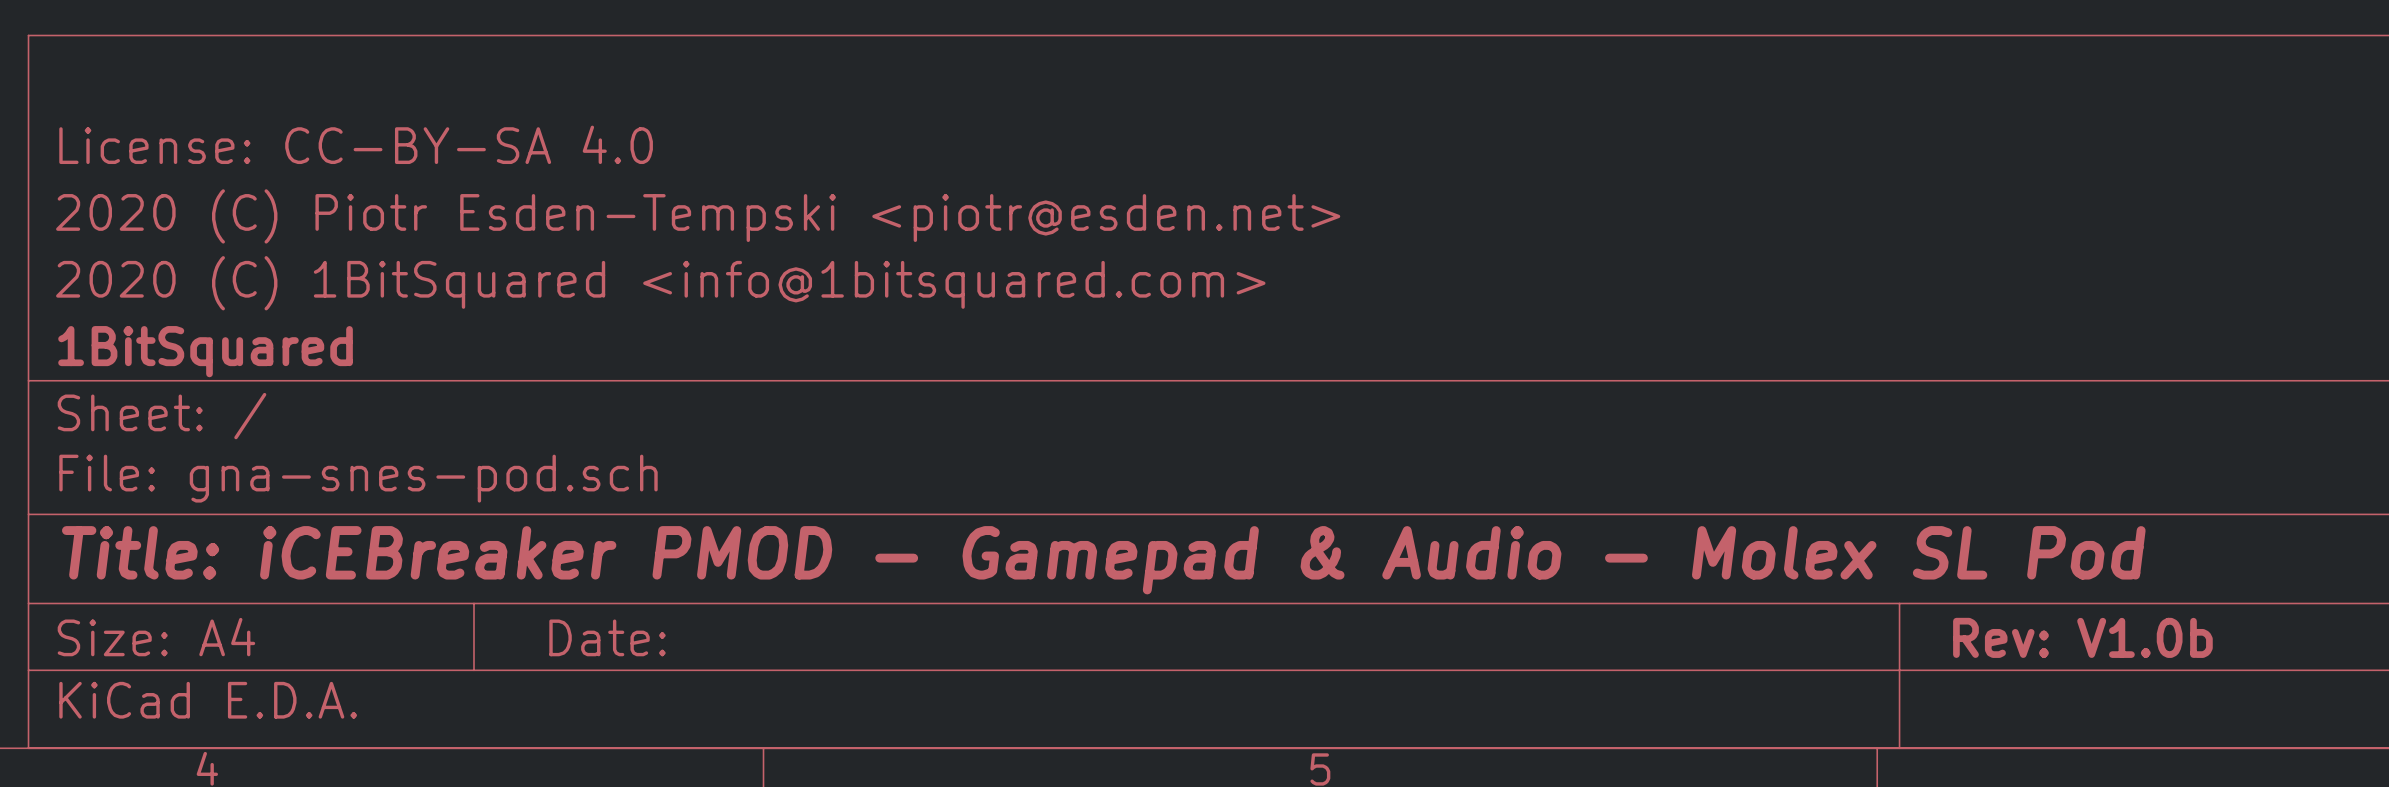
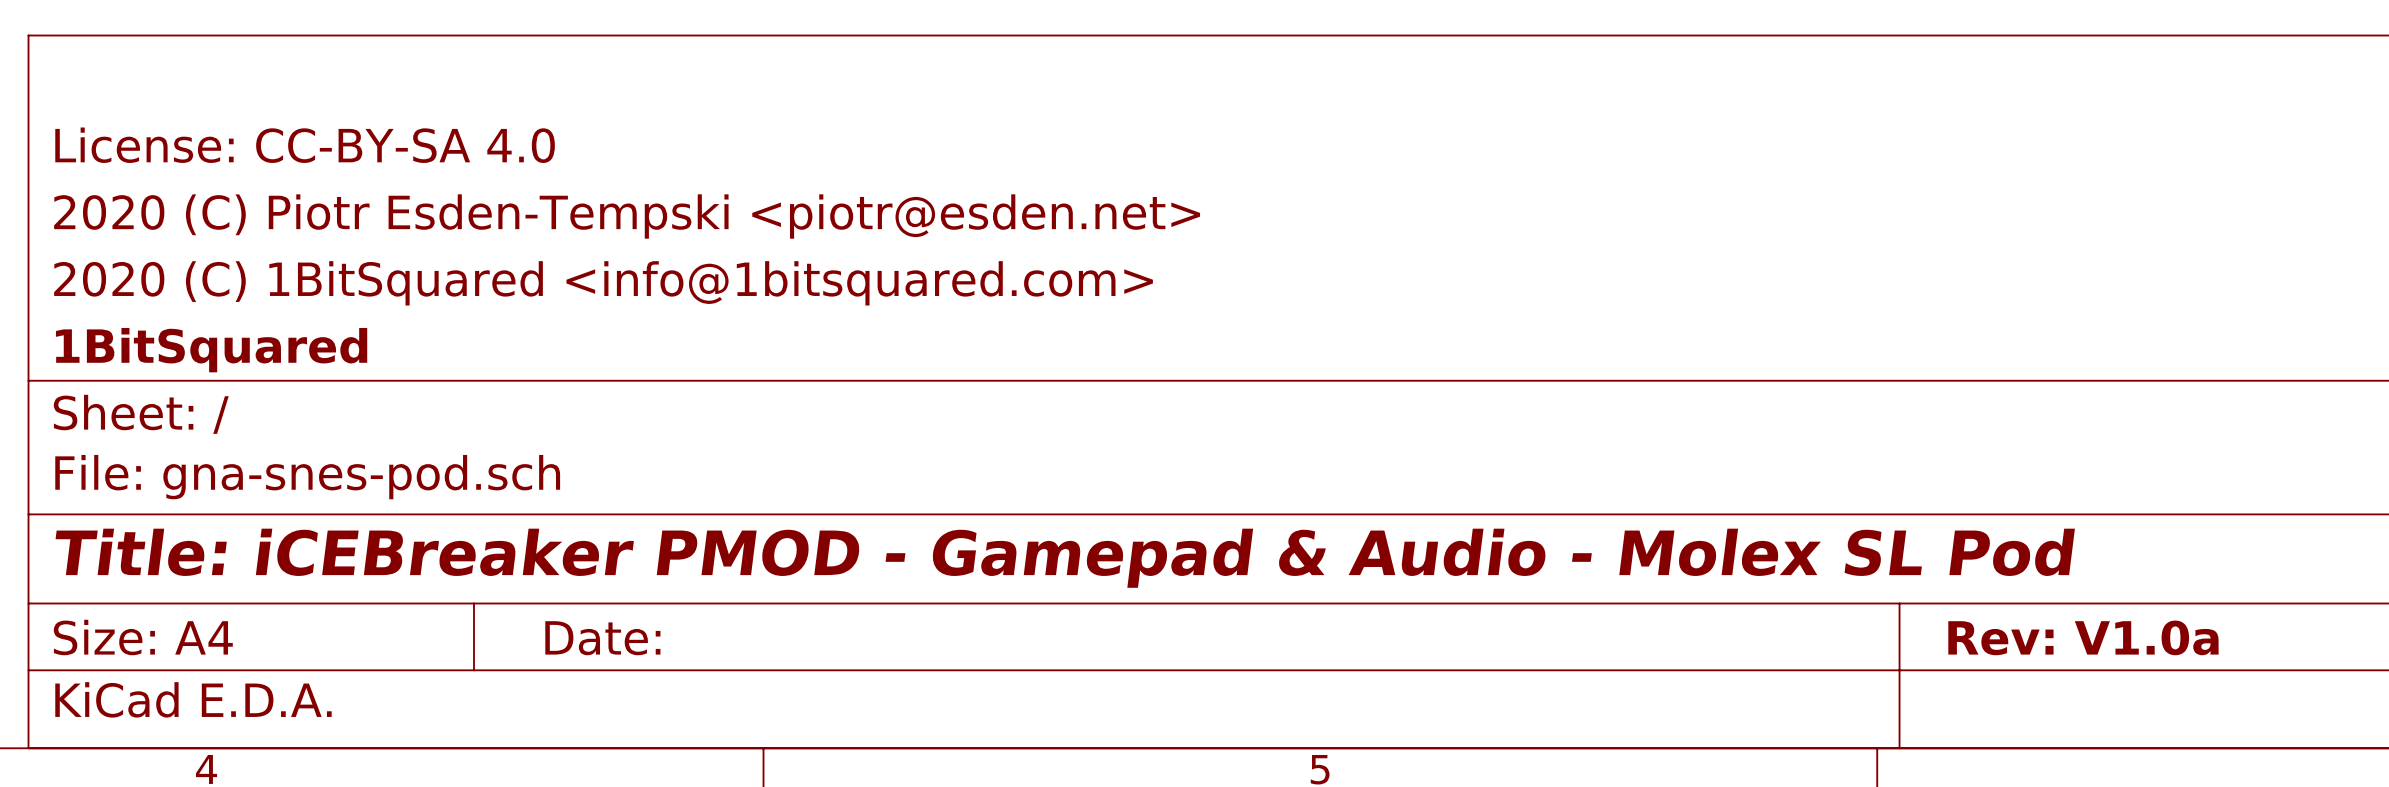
title block: Rev: V1.0b (2082, 637) -> Rev: V1.0a (2083, 637)

